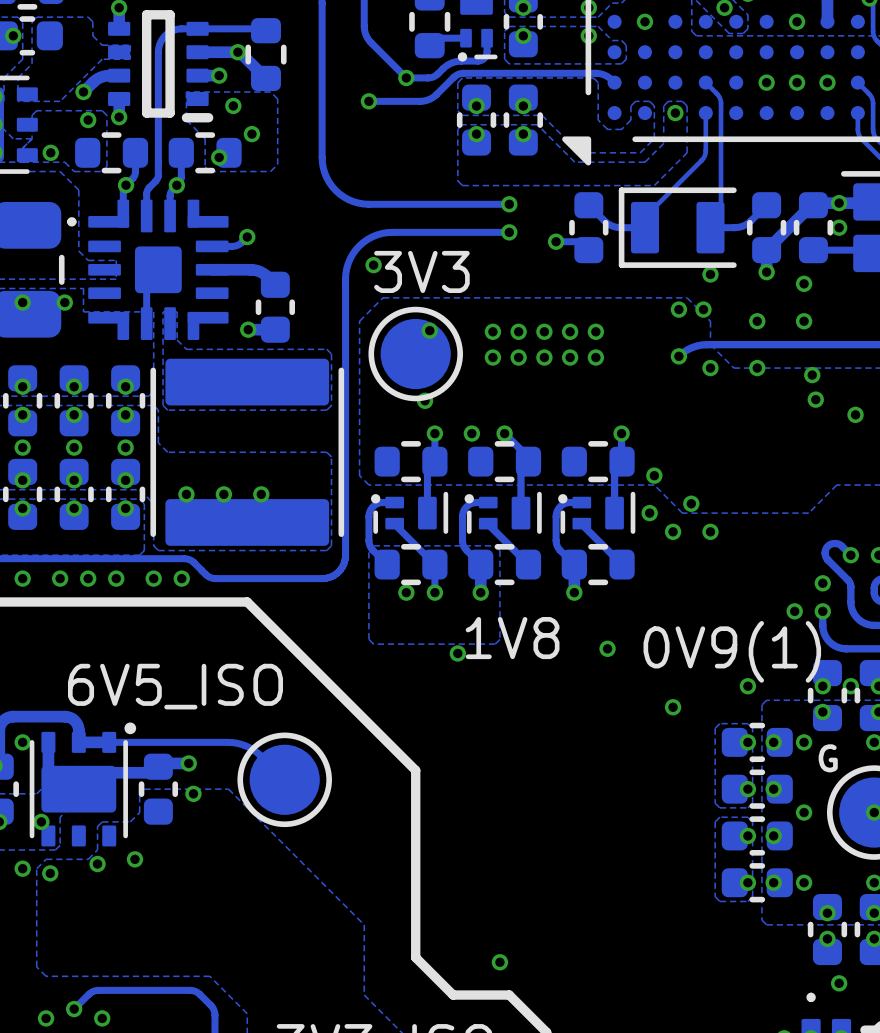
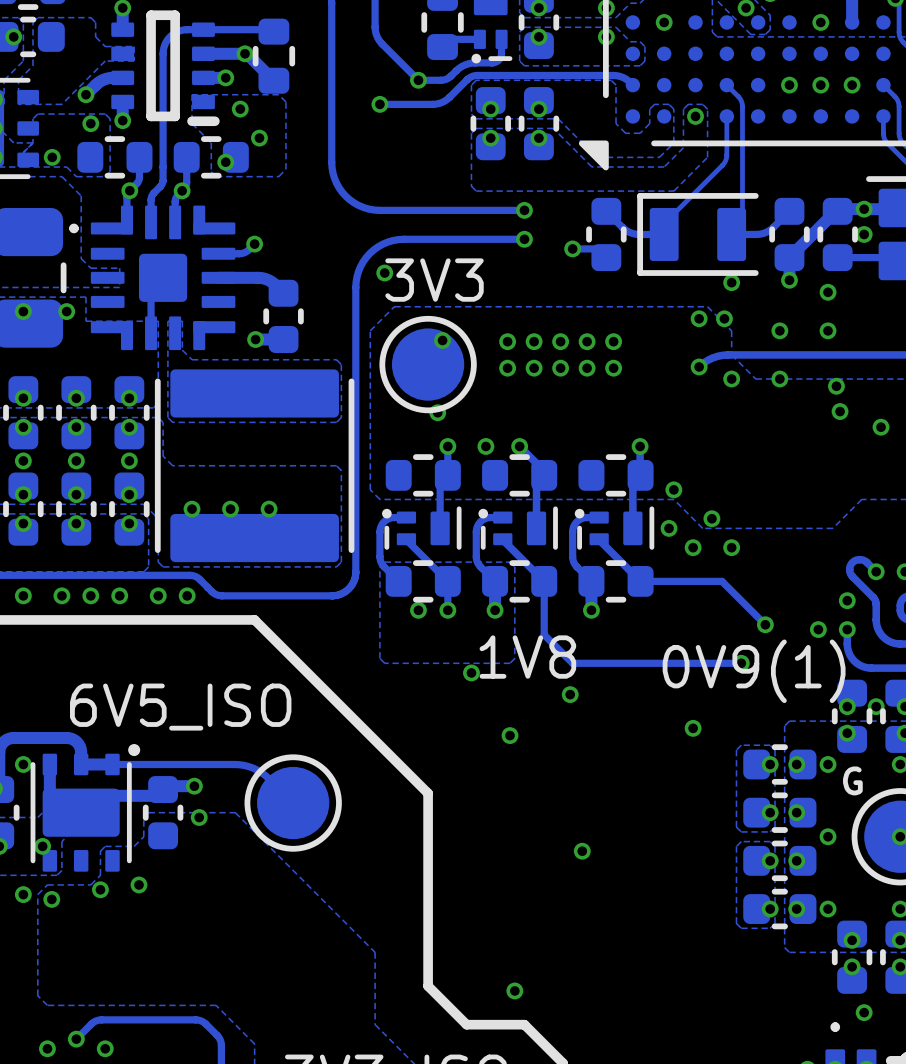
track: none -> (544, 581) (544, 634) (572, 663) (741, 663)
track: none -> (640, 581) (722, 581) (765, 624)
via: none -> (765, 624)
via: none -> (741, 663)
via: (607, 648) -> none
via: none -> (570, 694)
via: (747, 686) -> none
via: none -> (510, 735)
via: none -> (582, 851)

